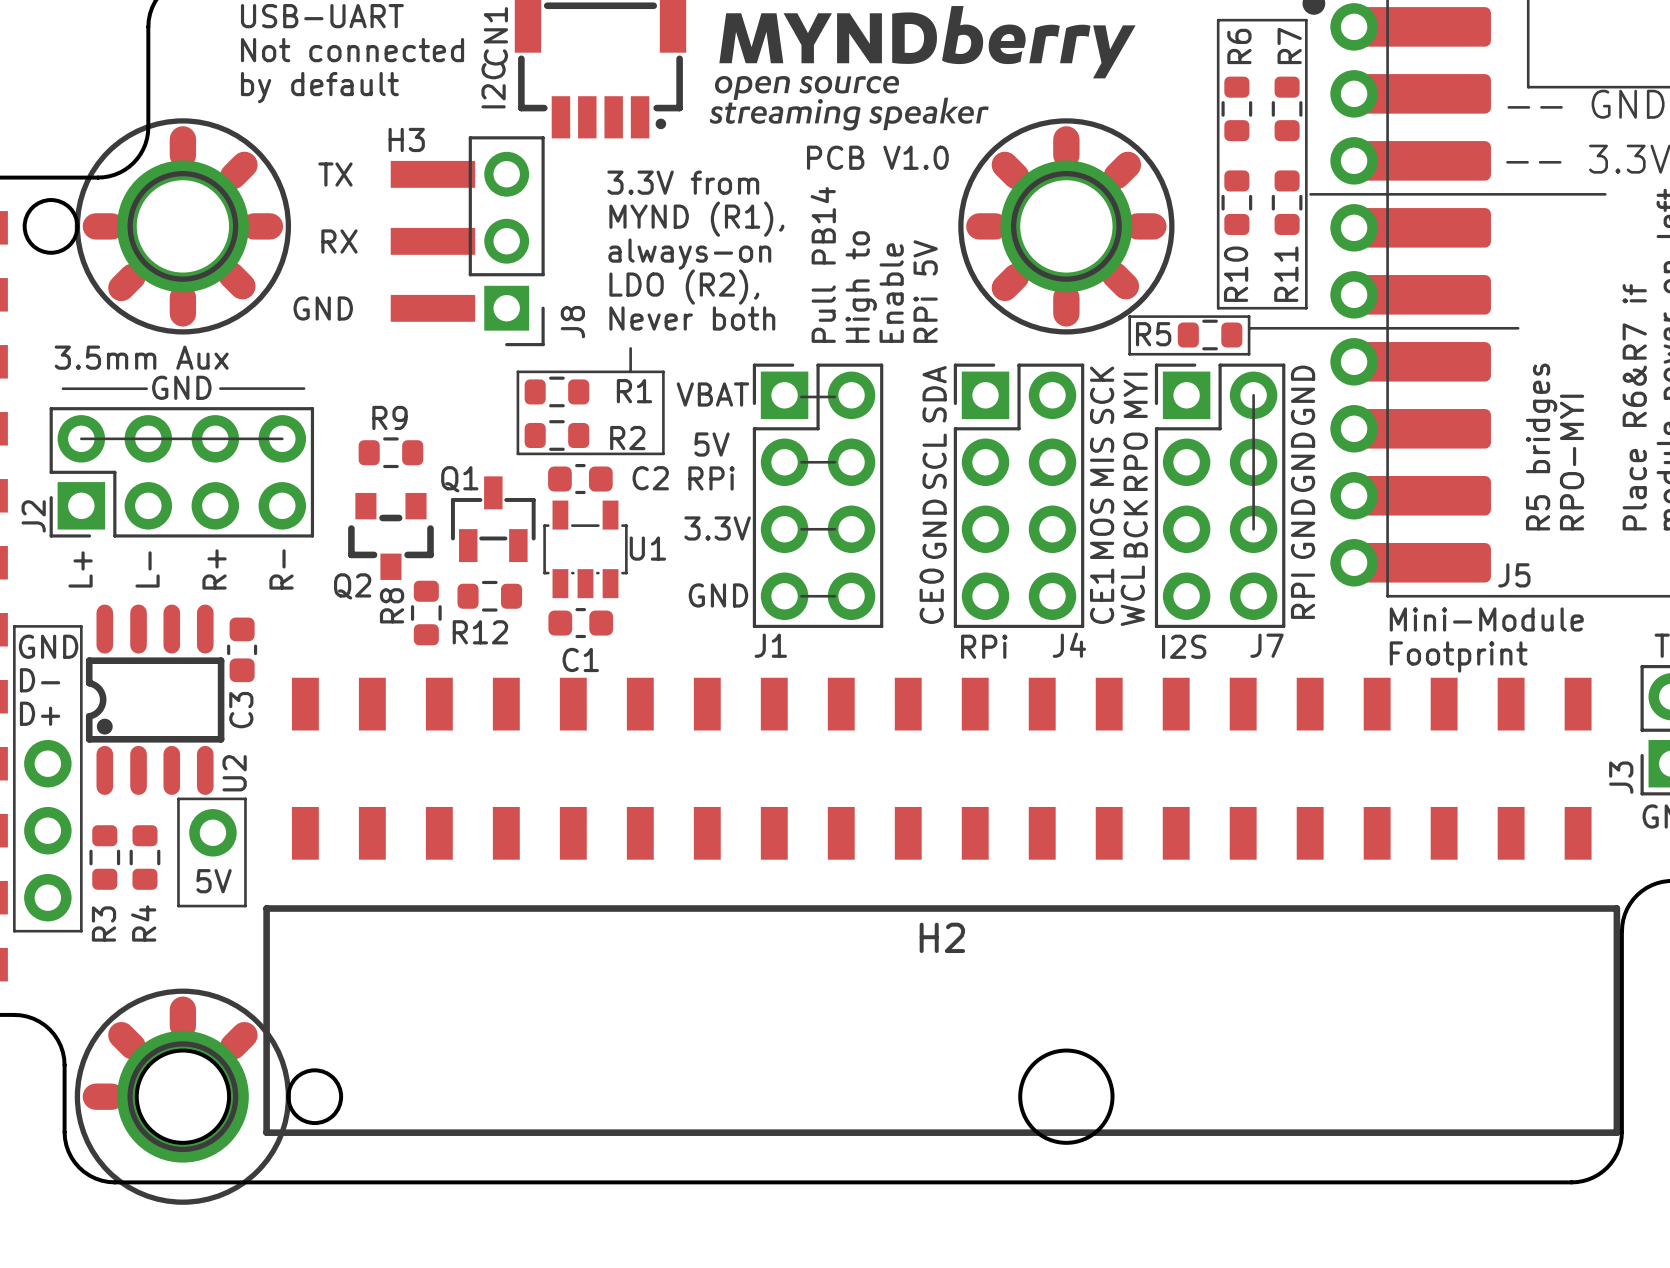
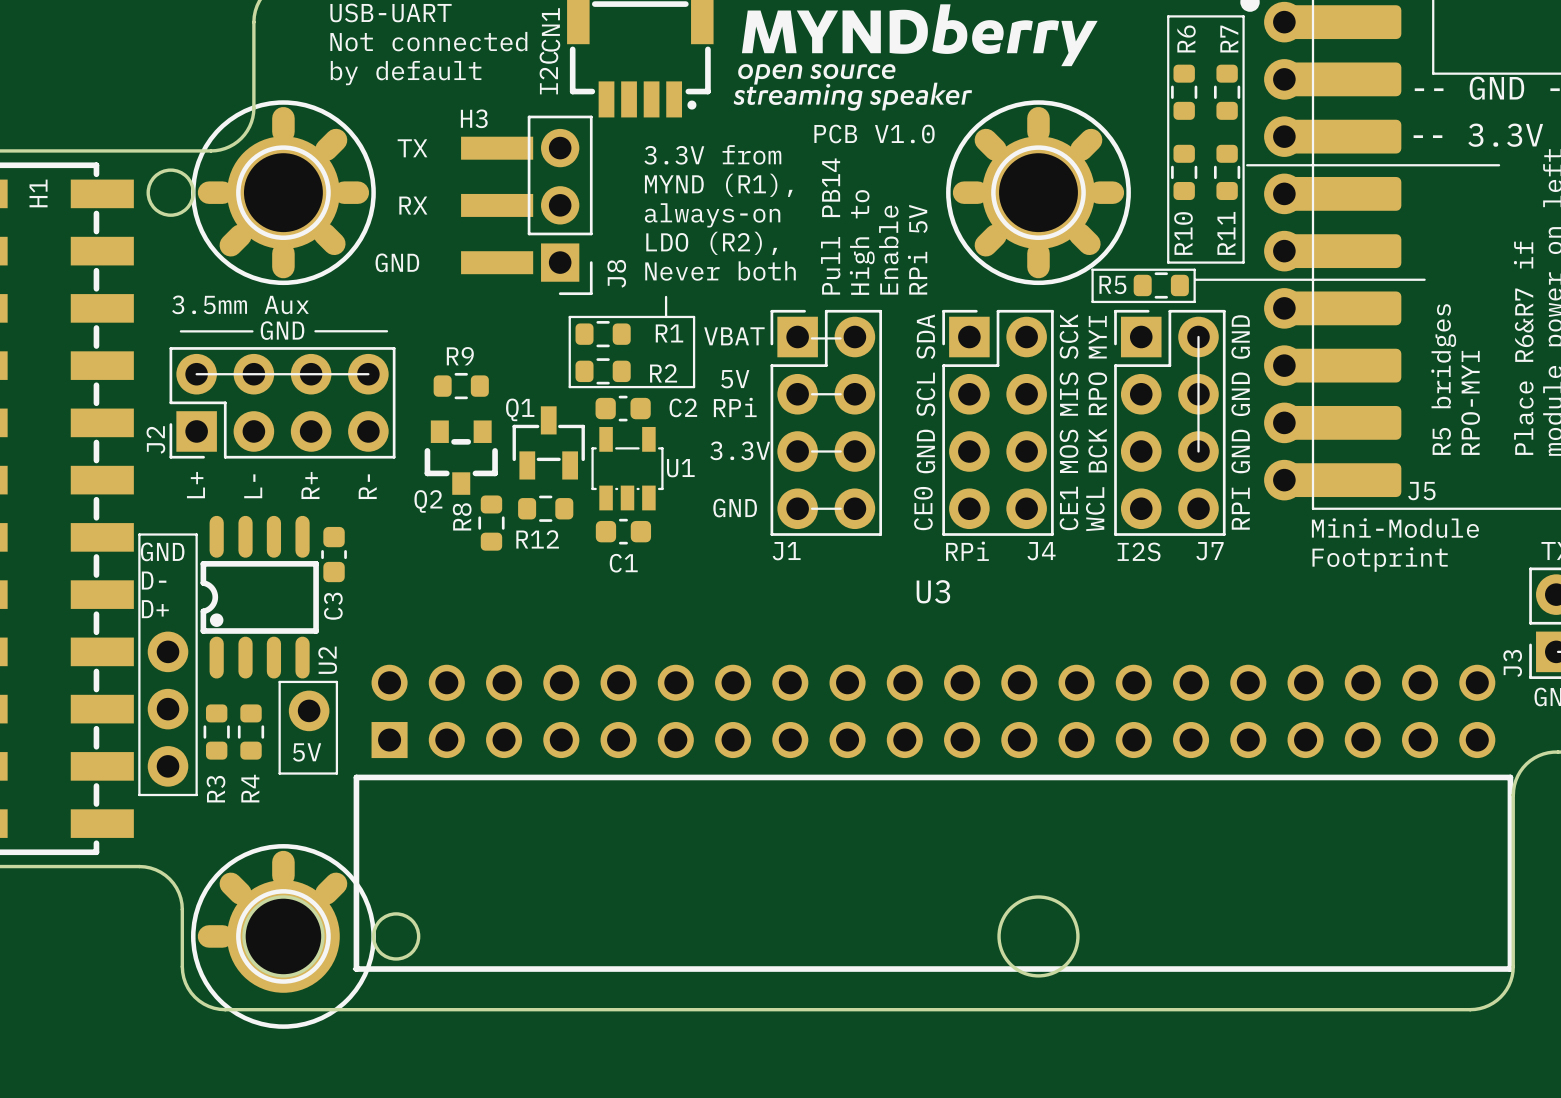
H2: (941, 906) -> none
U3: none -> (933, 818)

